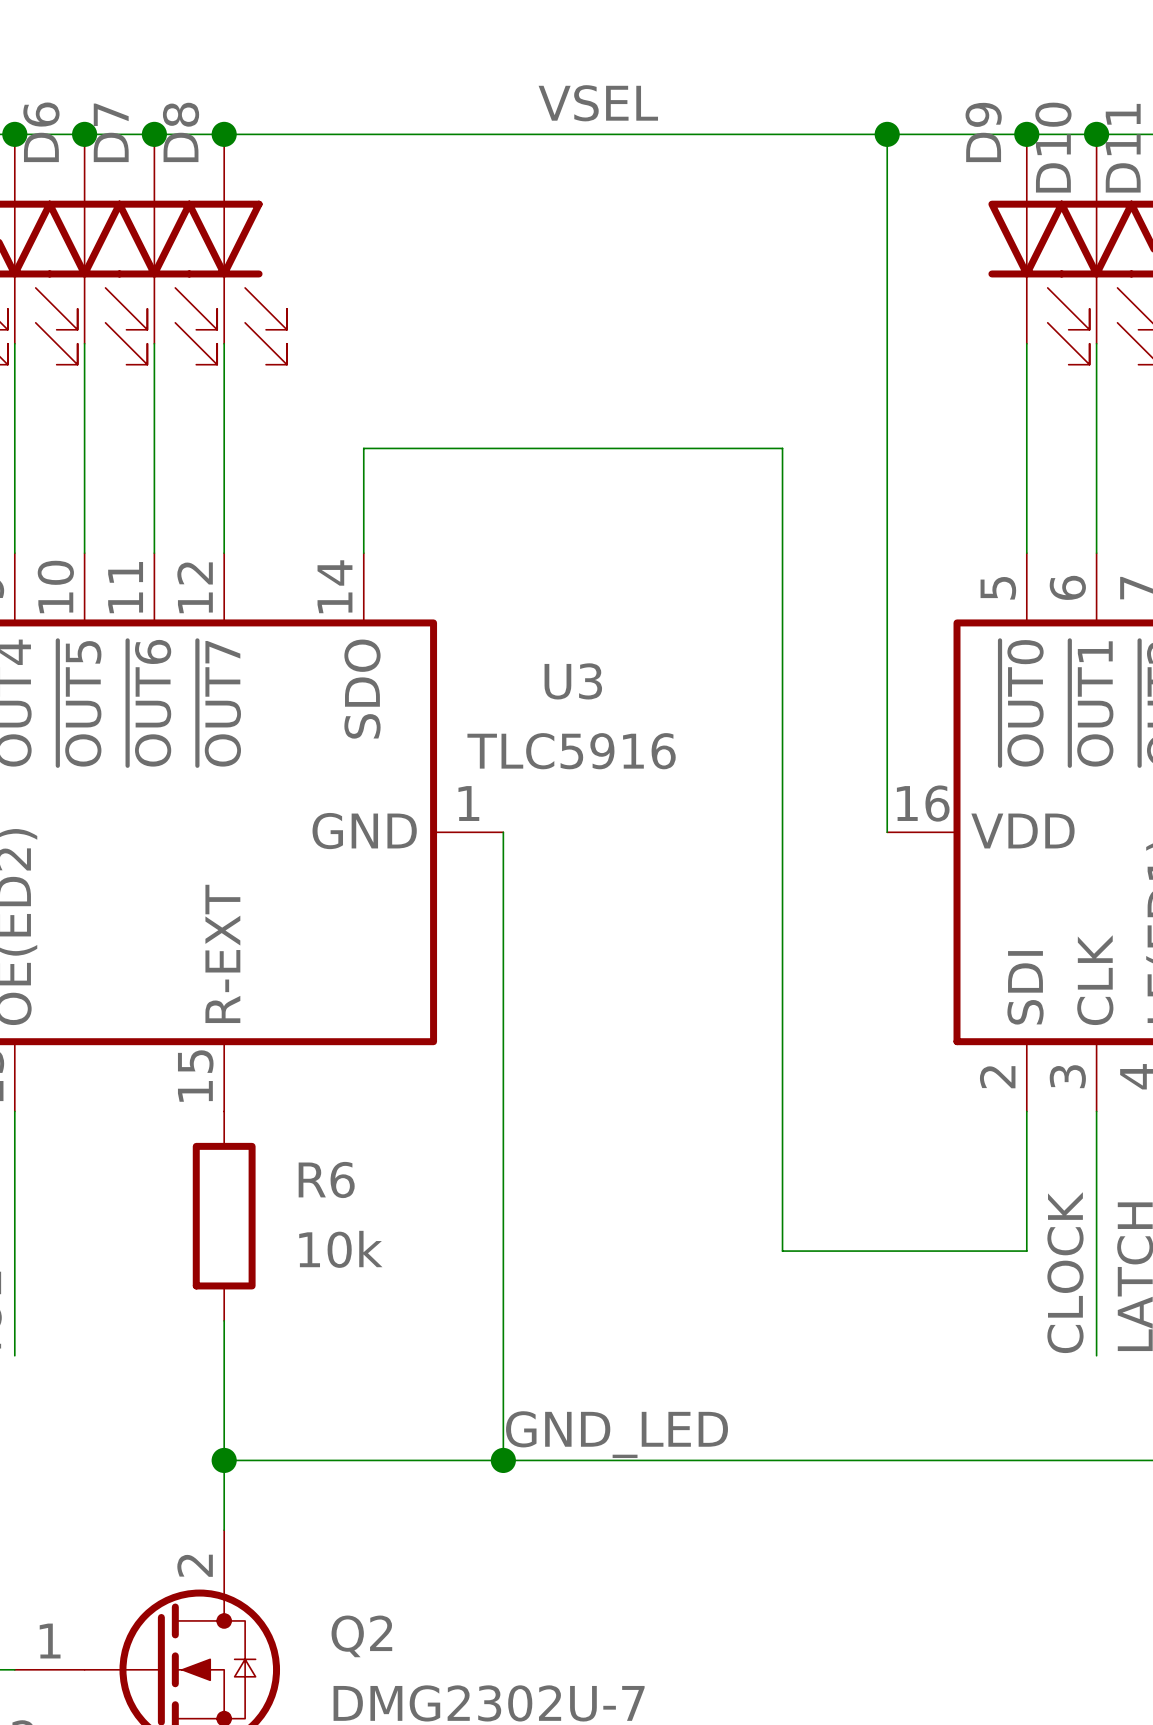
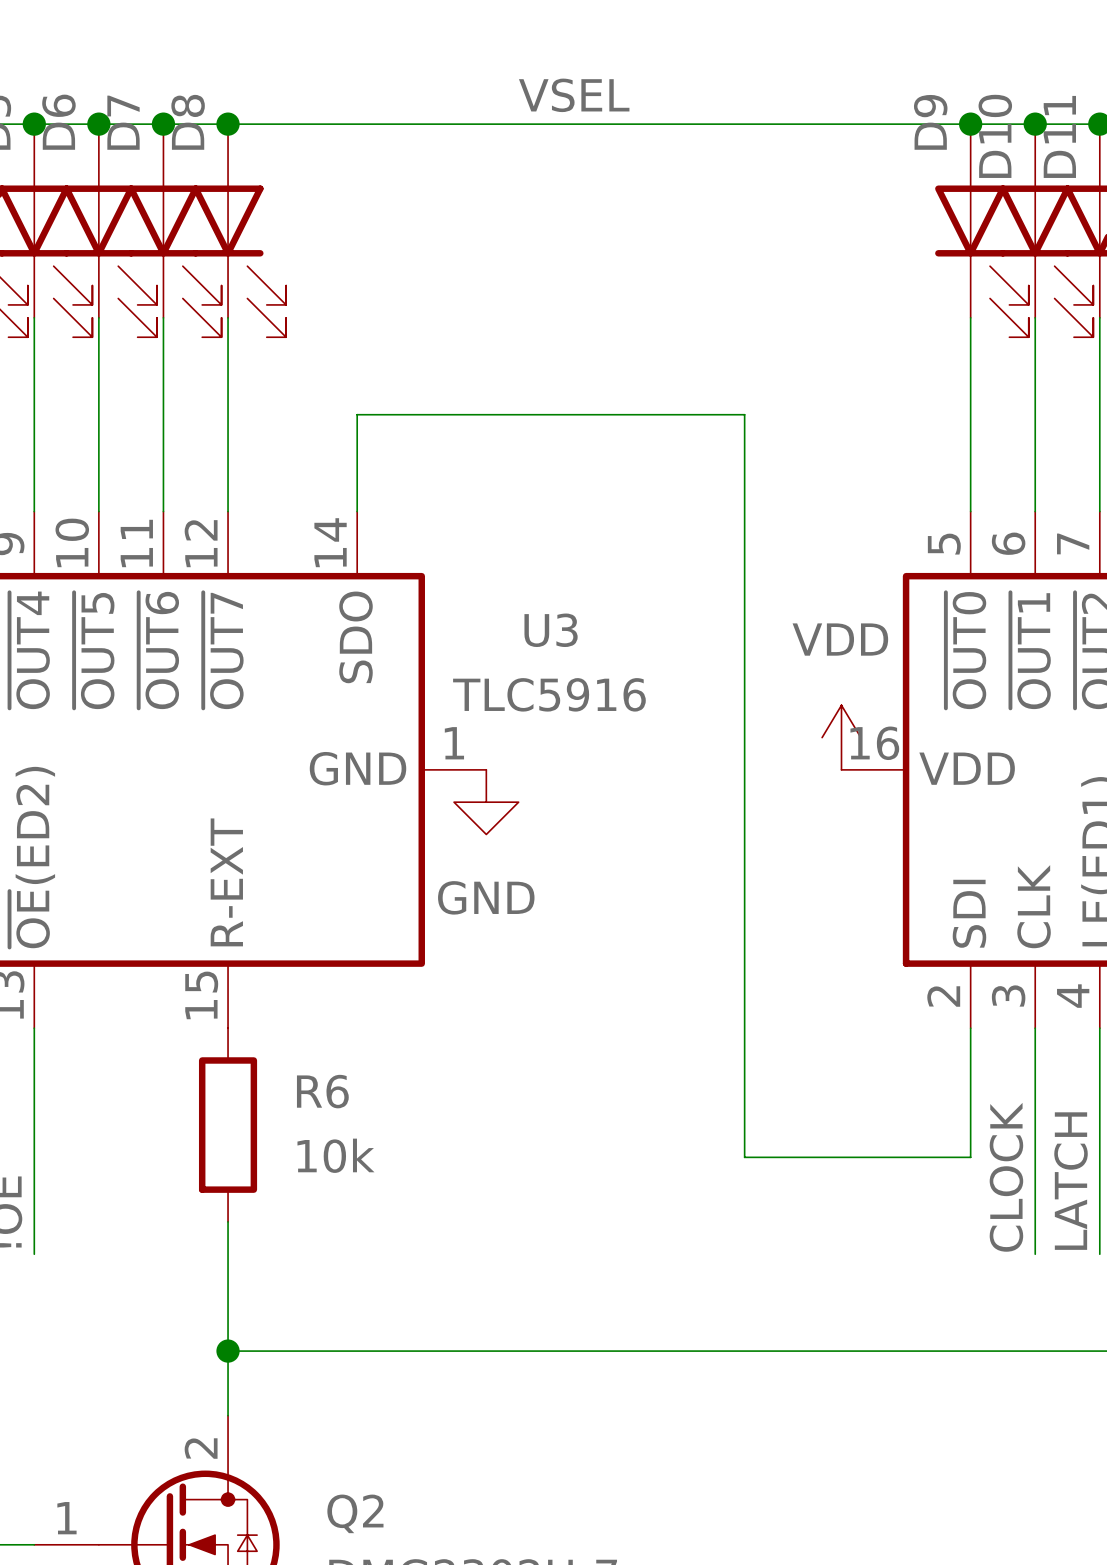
wire: (887, 134) (887, 832) -> none
junction: (887, 134) -> none
power symbol: none -> VDD (841, 737)
wire: (503, 832) (503, 1460) -> none
power symbol: none -> GND (486, 802)
label: GND_LED (617, 1434) -> none
junction: (503, 1460) -> none

